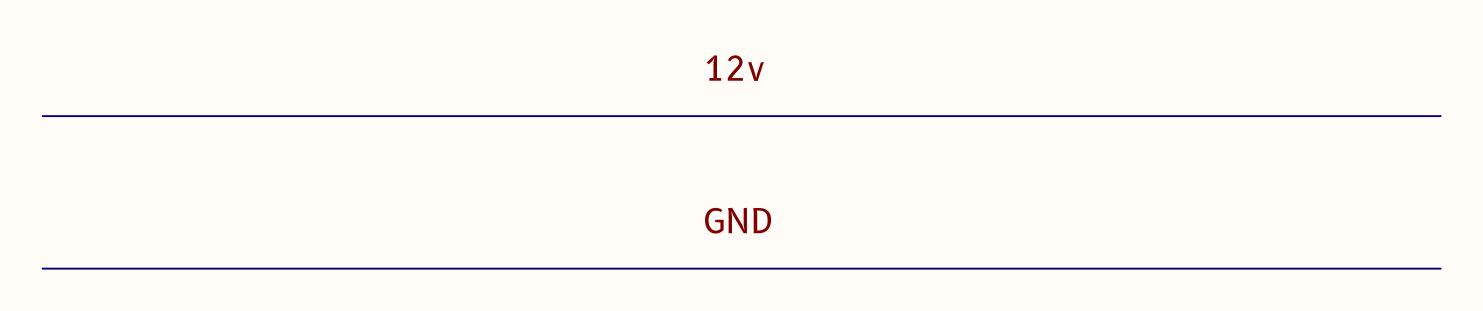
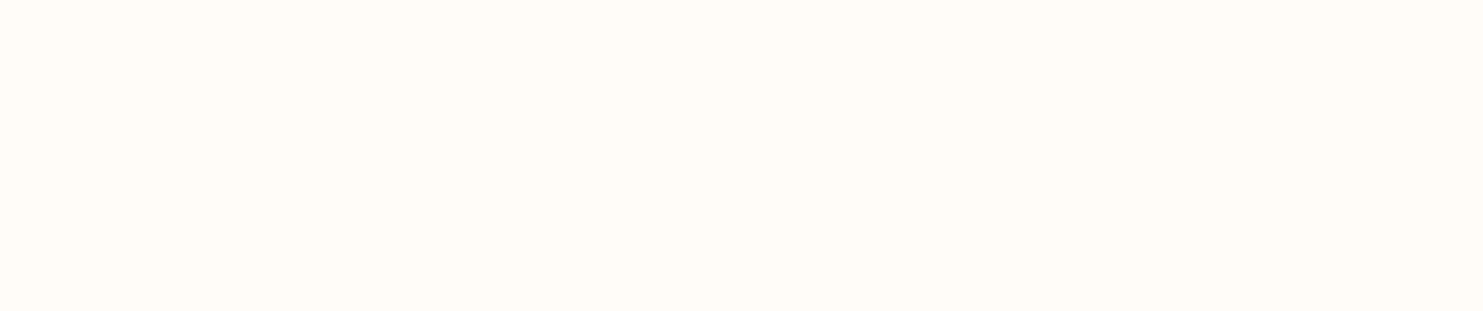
label: 12v (735, 68) -> none
bus: (42, 116) (1440, 116) -> none
label: GND (738, 220) -> none
bus: (42, 268) (1440, 268) -> none

